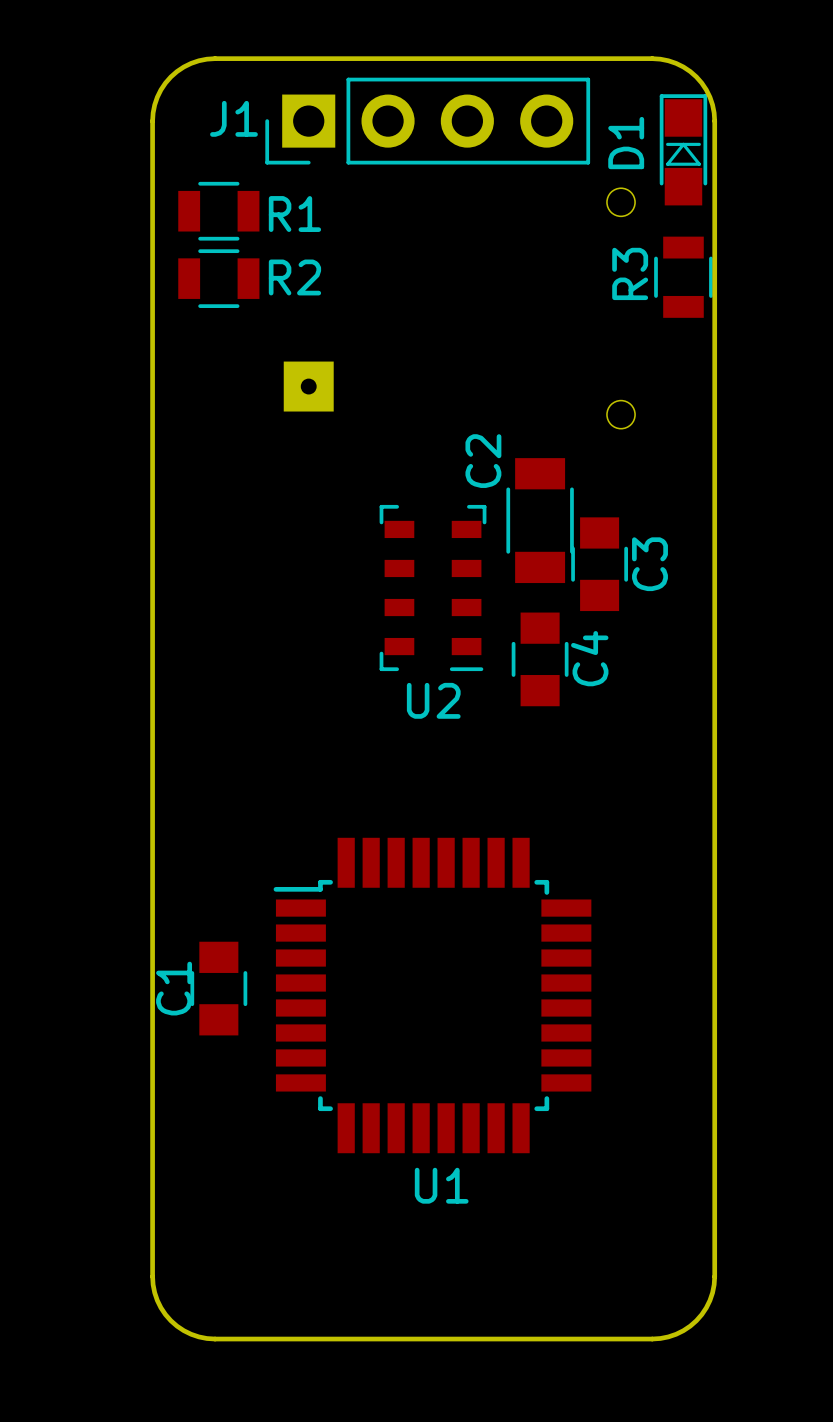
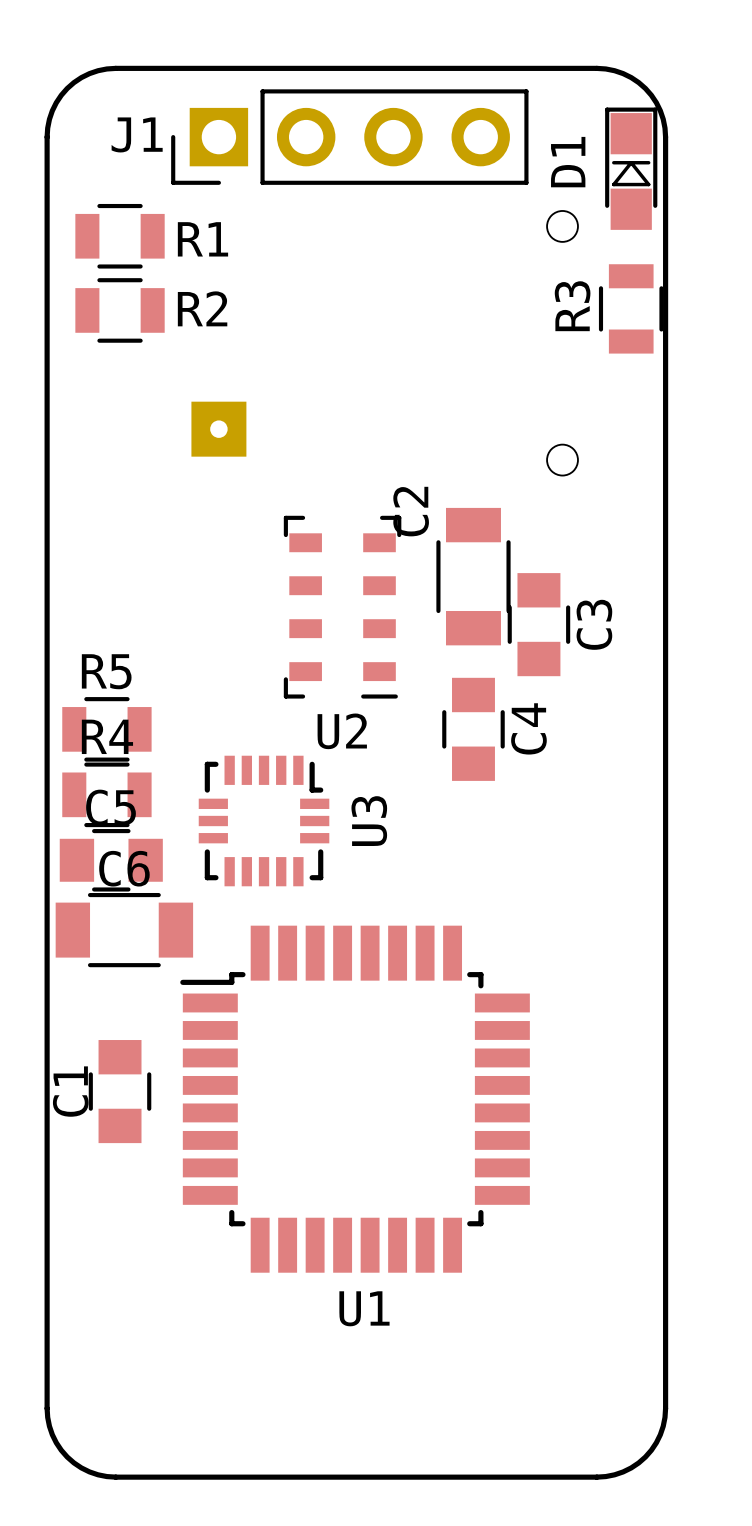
U2 position: (433, 588) -> (342, 607)
R5: none -> (106, 729)
R4: none -> (106, 794)
U3: none -> (264, 821)
C5: none -> (111, 860)
C6: none -> (124, 930)

